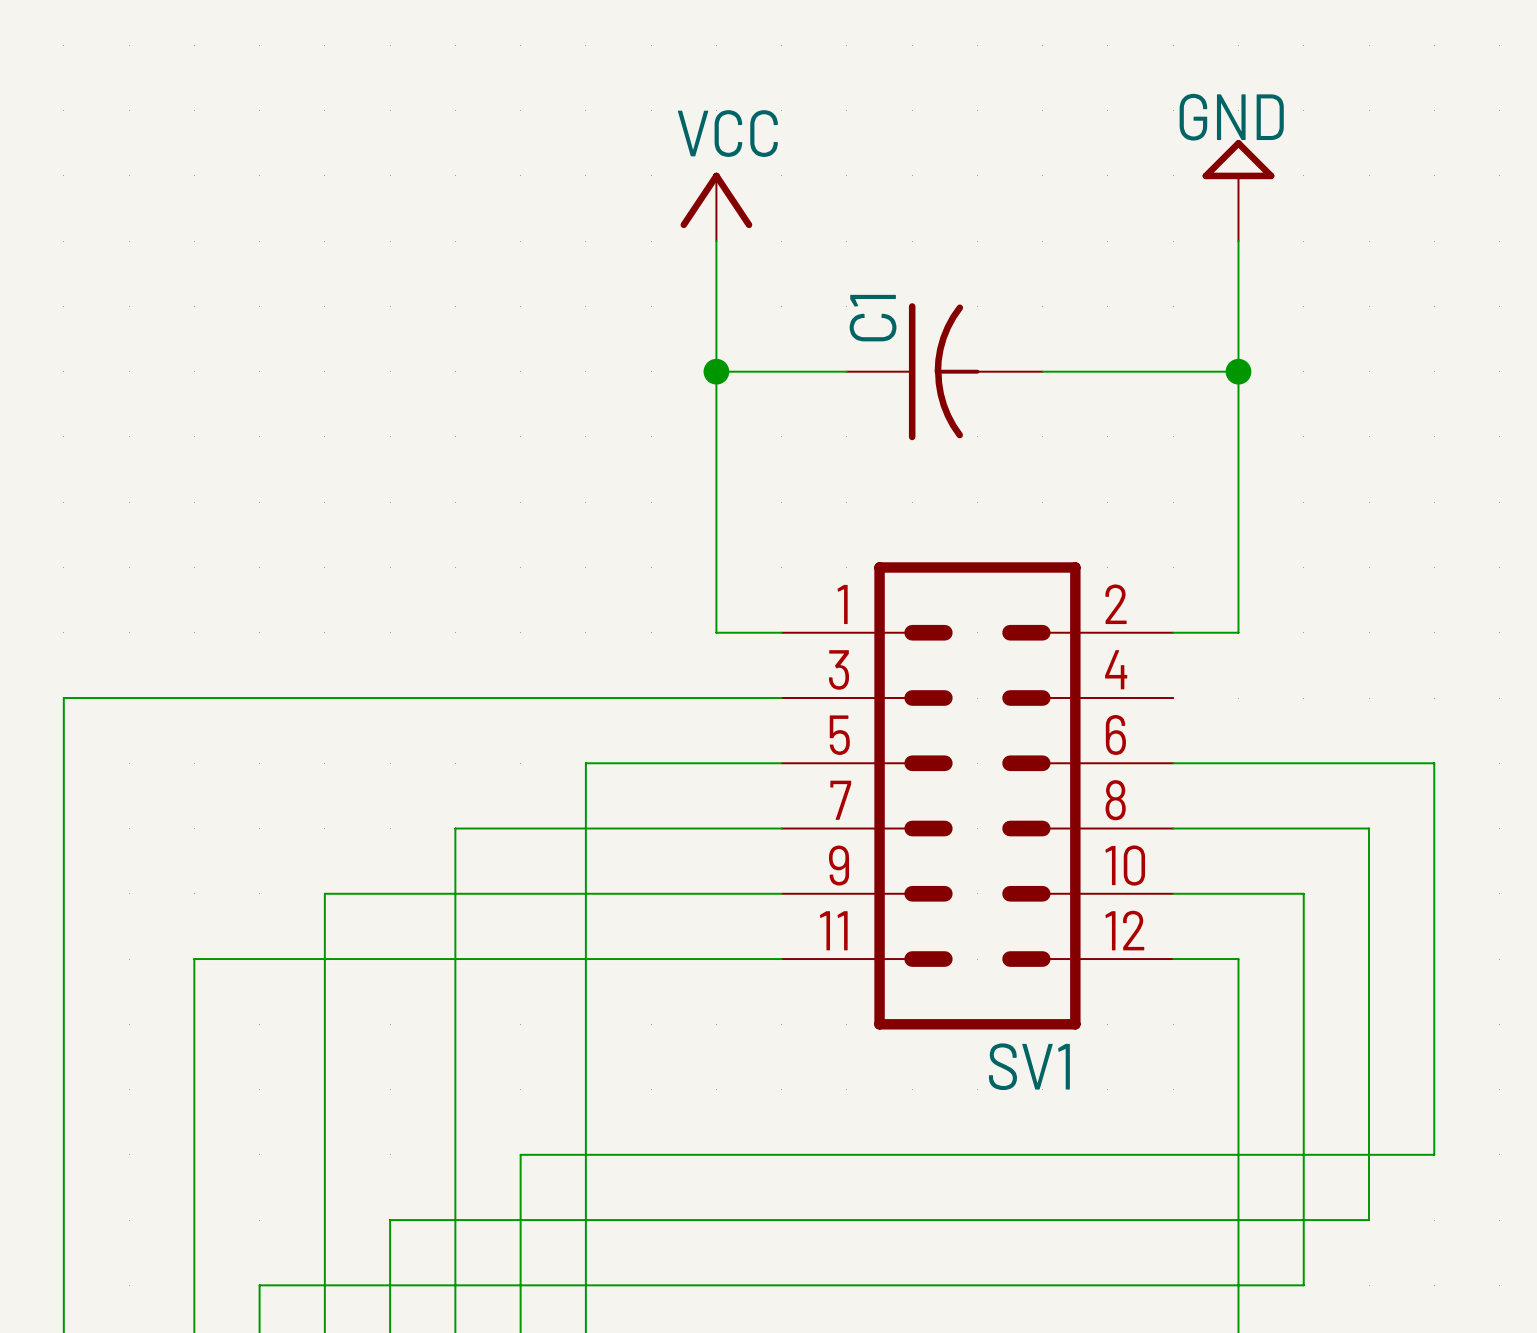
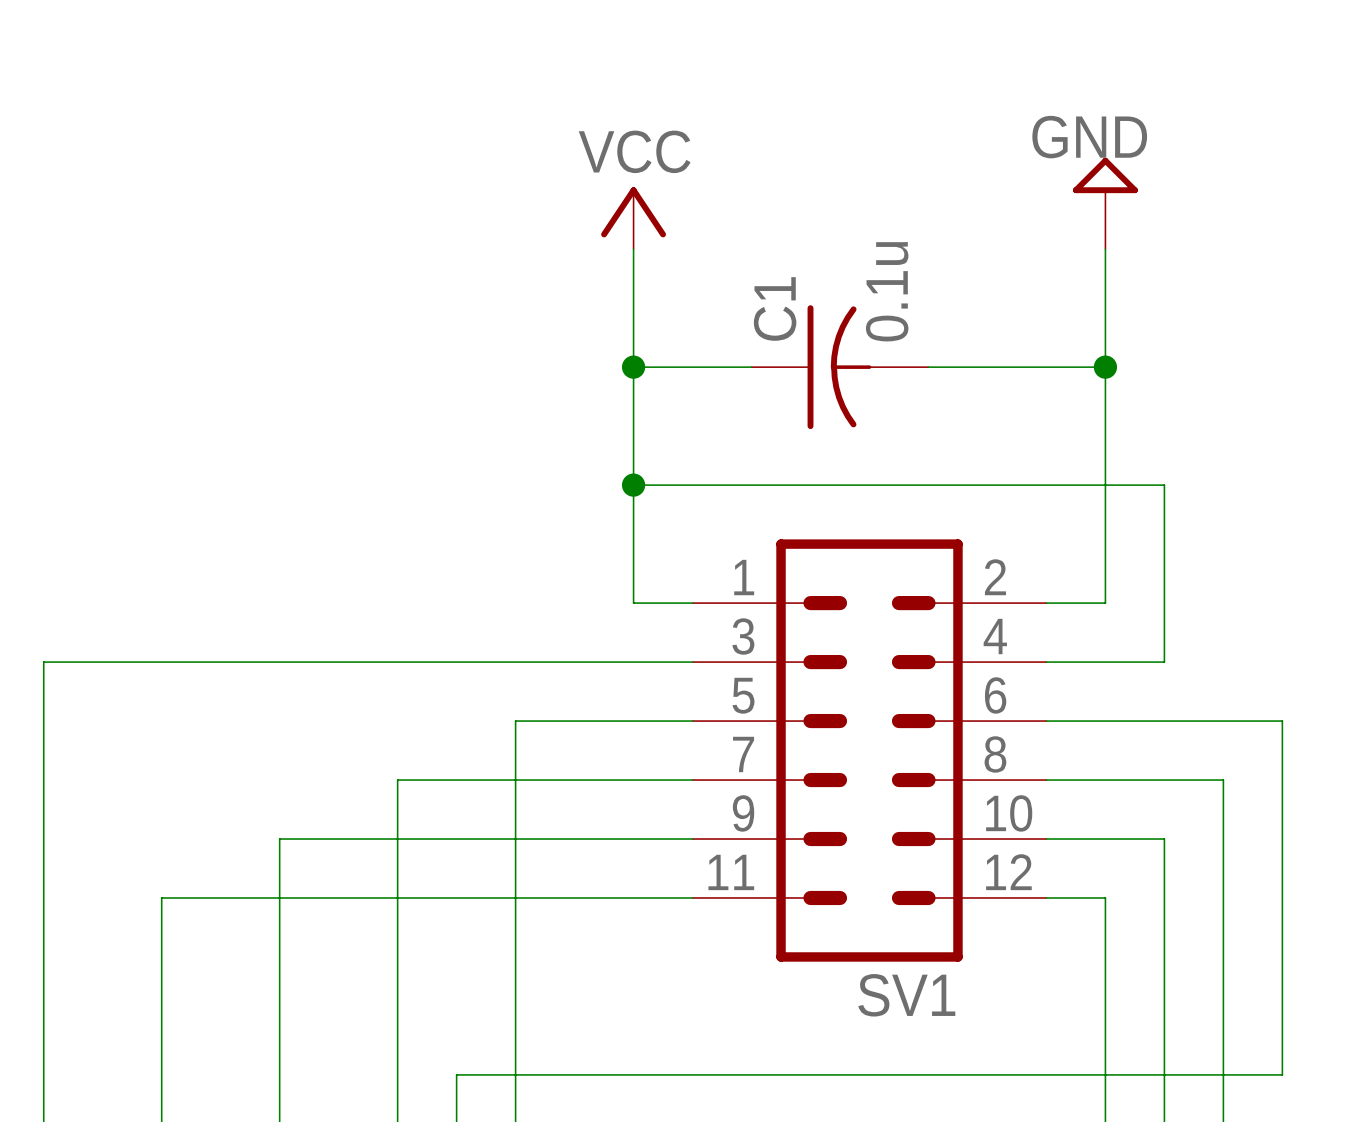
C1 value: none -> 0.1u (887, 291)
wire: none -> (633, 485) (1164, 485) (1164, 662) (1046, 662)
junction: none -> (633, 485)

